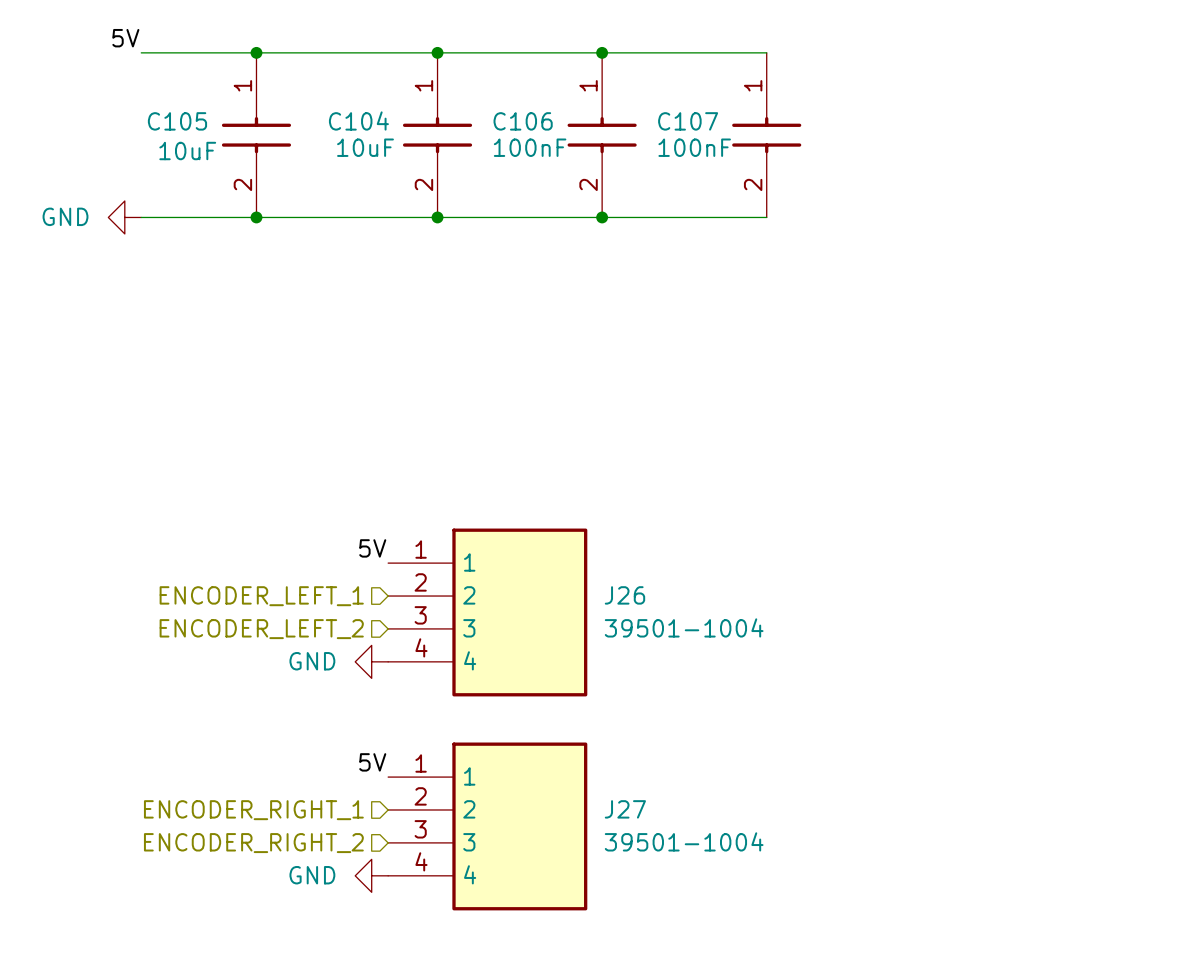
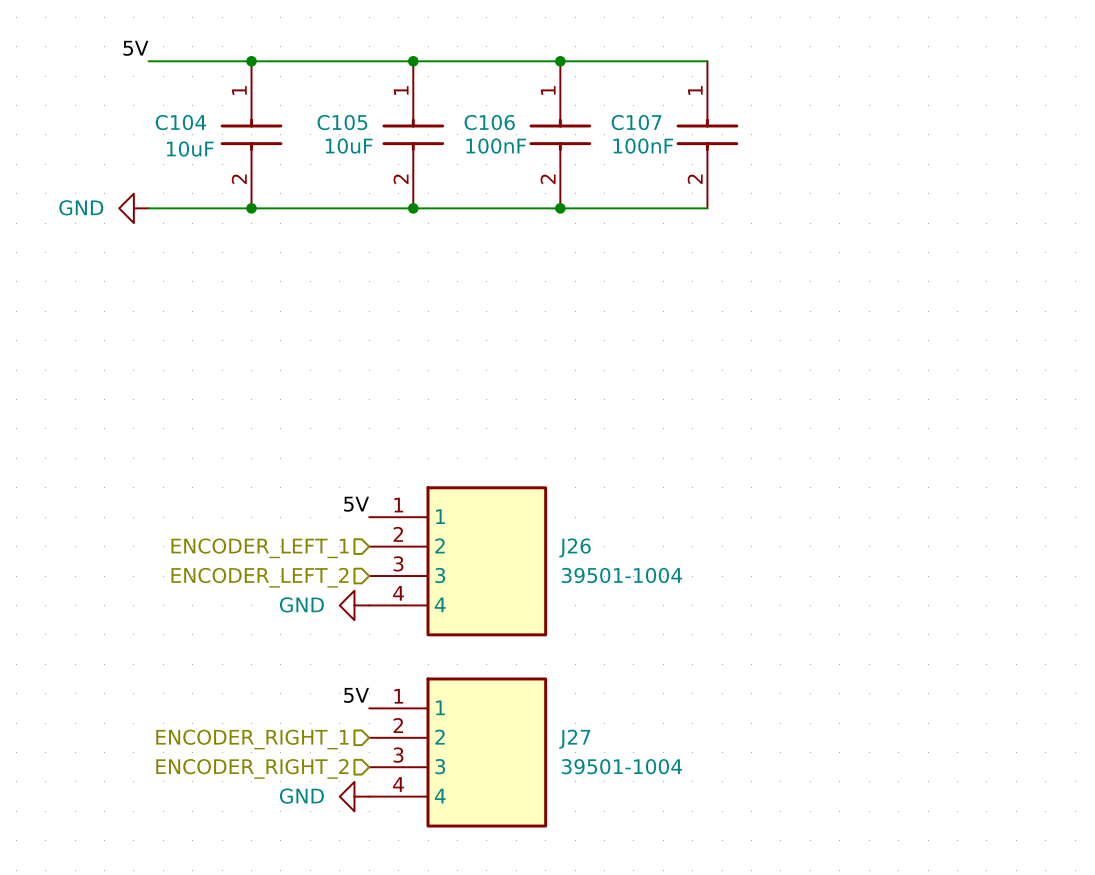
C104 name: C104 (358, 120) -> C105 (342, 122)
C105 name: C105 (177, 121) -> C104 (180, 122)

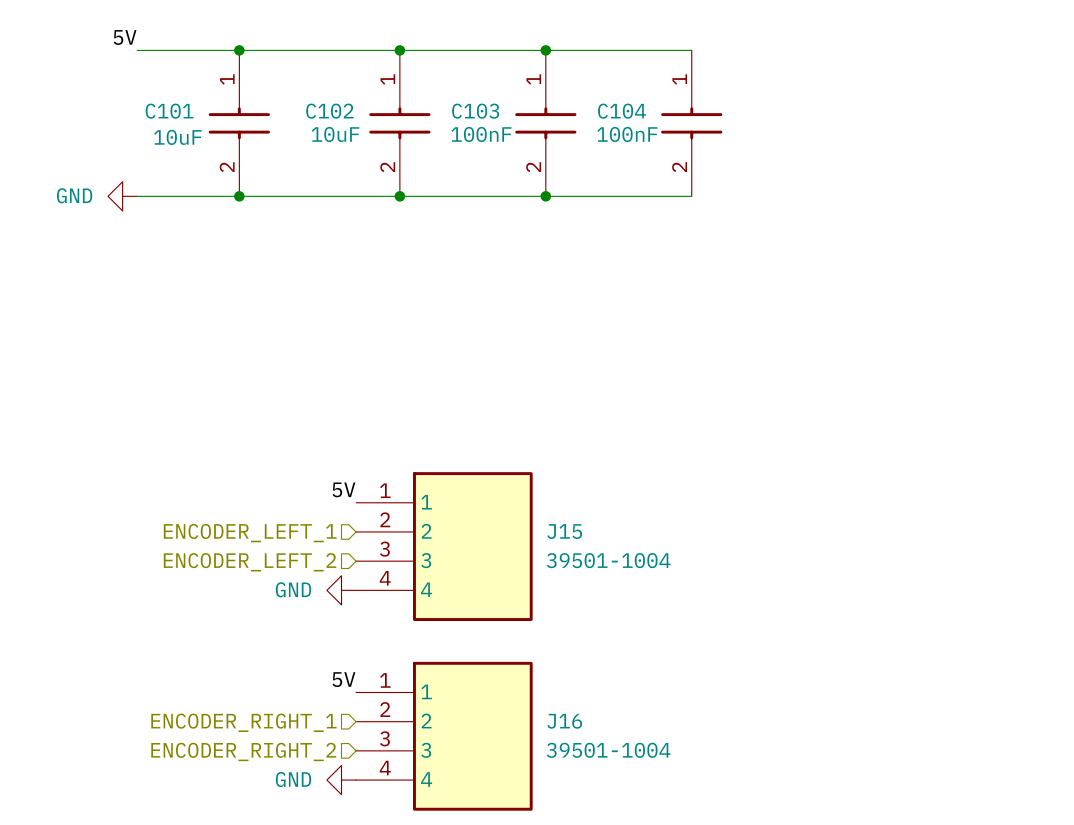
C104 name: C104 (180, 122) -> C101 (169, 111)
C105 name: C105 (342, 122) -> C102 (329, 111)
C106 name: C106 (489, 122) -> C103 (475, 111)
C107 name: C107 (636, 122) -> C104 (622, 111)
J26 name: J26 (575, 547) -> J15 (564, 531)
J27 name: J27 (574, 739) -> J16 (564, 721)

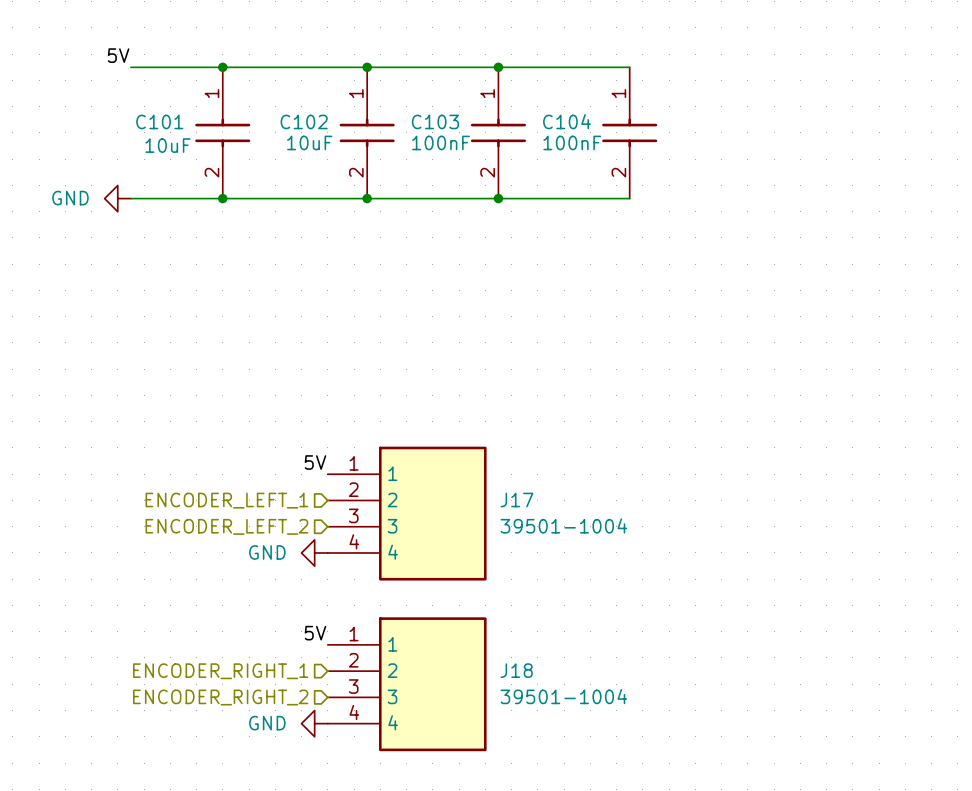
J15 name: J15 (564, 531) -> J17 (516, 499)
J16 name: J16 (564, 721) -> J18 (516, 670)

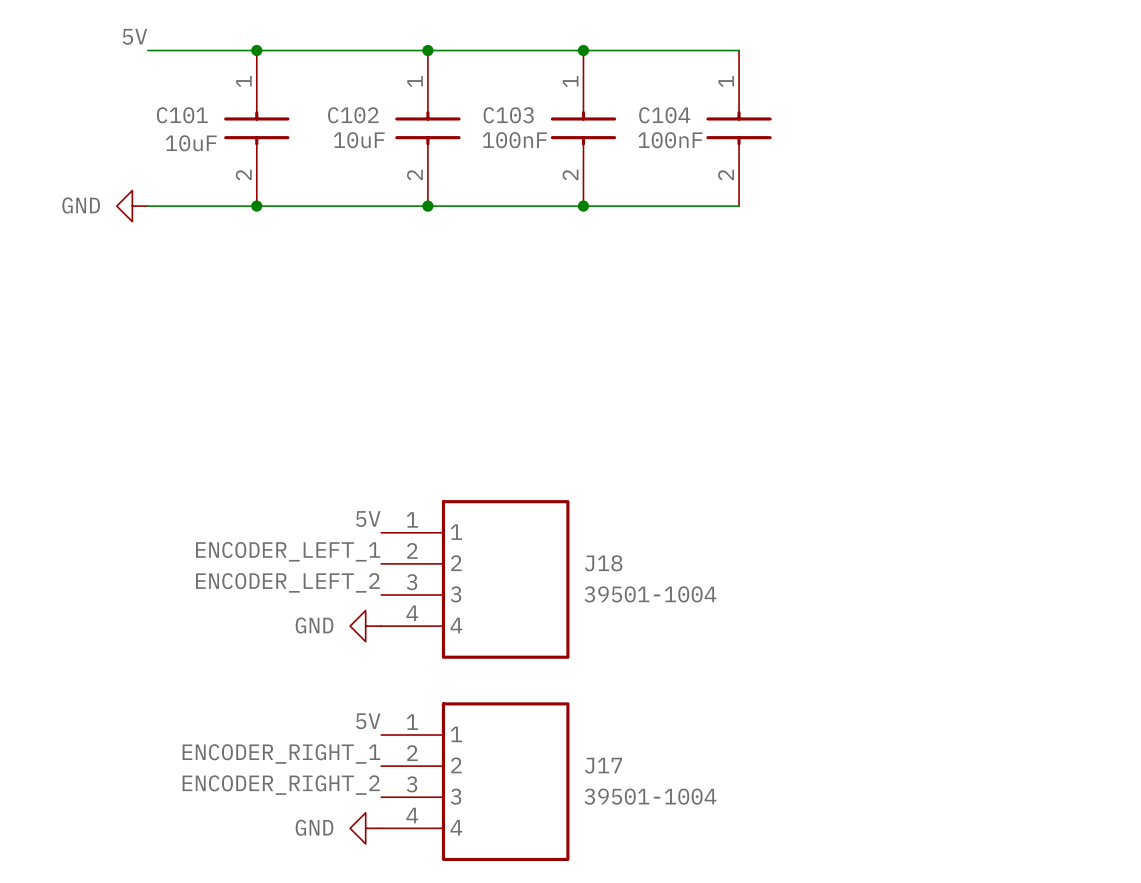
label: none -> ENCODER_LEFT_1 (288, 551)
J17 name: J17 (516, 499) -> J18 (603, 563)
hierarchical label: ENCODER_LEFT_1 (226, 500) -> none
label: none -> ENCODER_LEFT_2 (287, 582)
hierarchical label: ENCODER_LEFT_2 (226, 526) -> none
label: none -> ENCODER_RIGHT_1 (281, 753)
J18 name: J18 (516, 670) -> J17 (603, 765)
hierarchical label: ENCODER_RIGHT_1 (220, 671) -> none
label: none -> ENCODER_RIGHT_2 (281, 785)
hierarchical label: ENCODER_RIGHT_2 (220, 697) -> none

